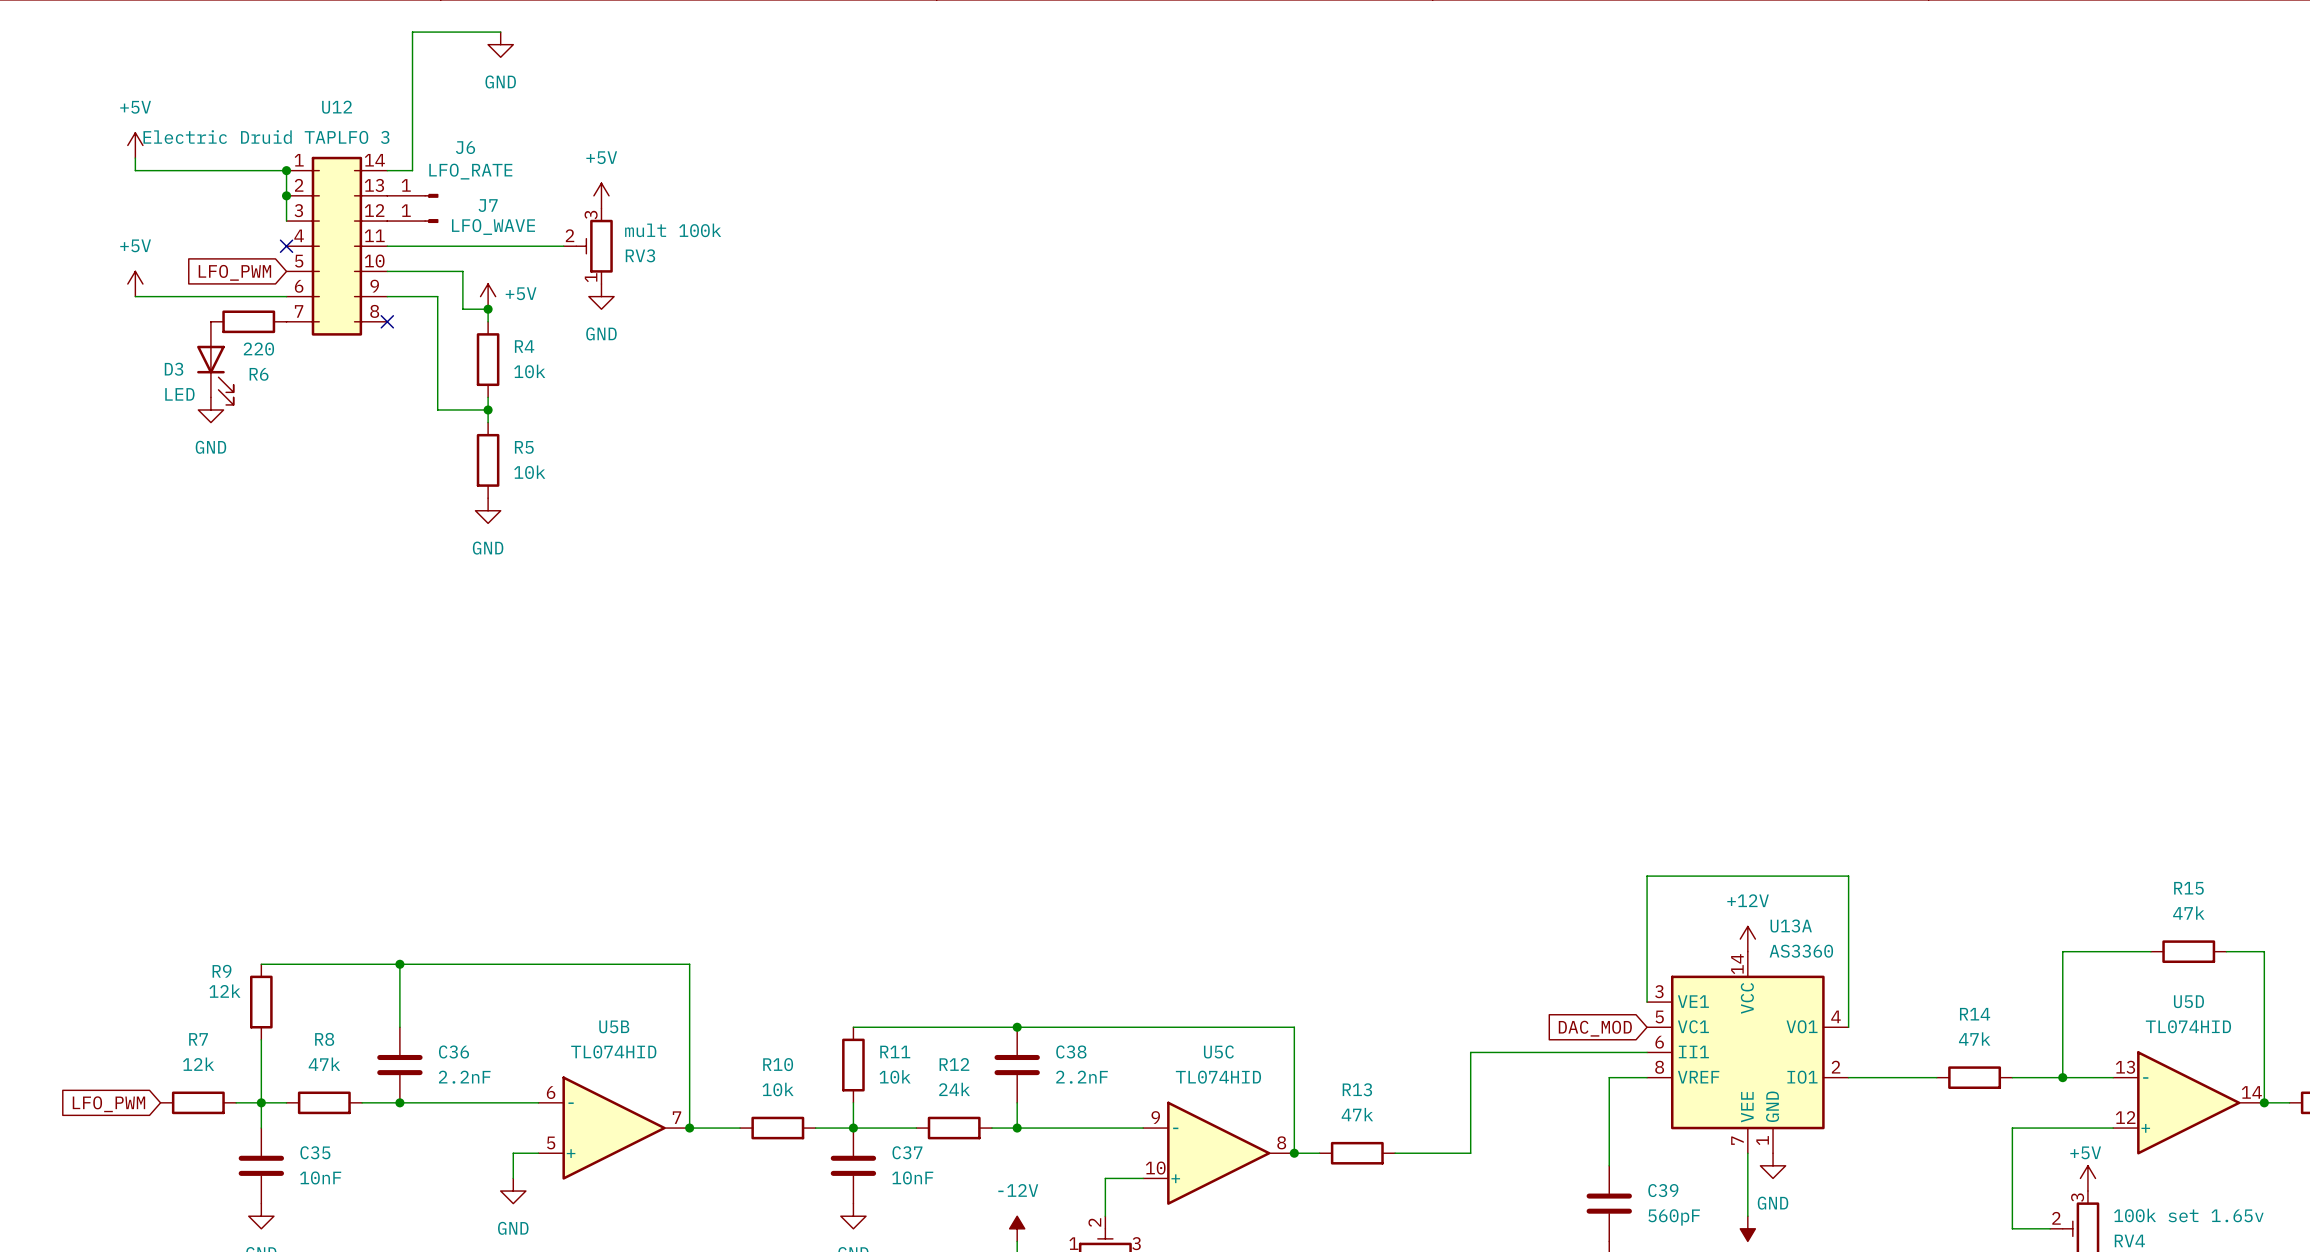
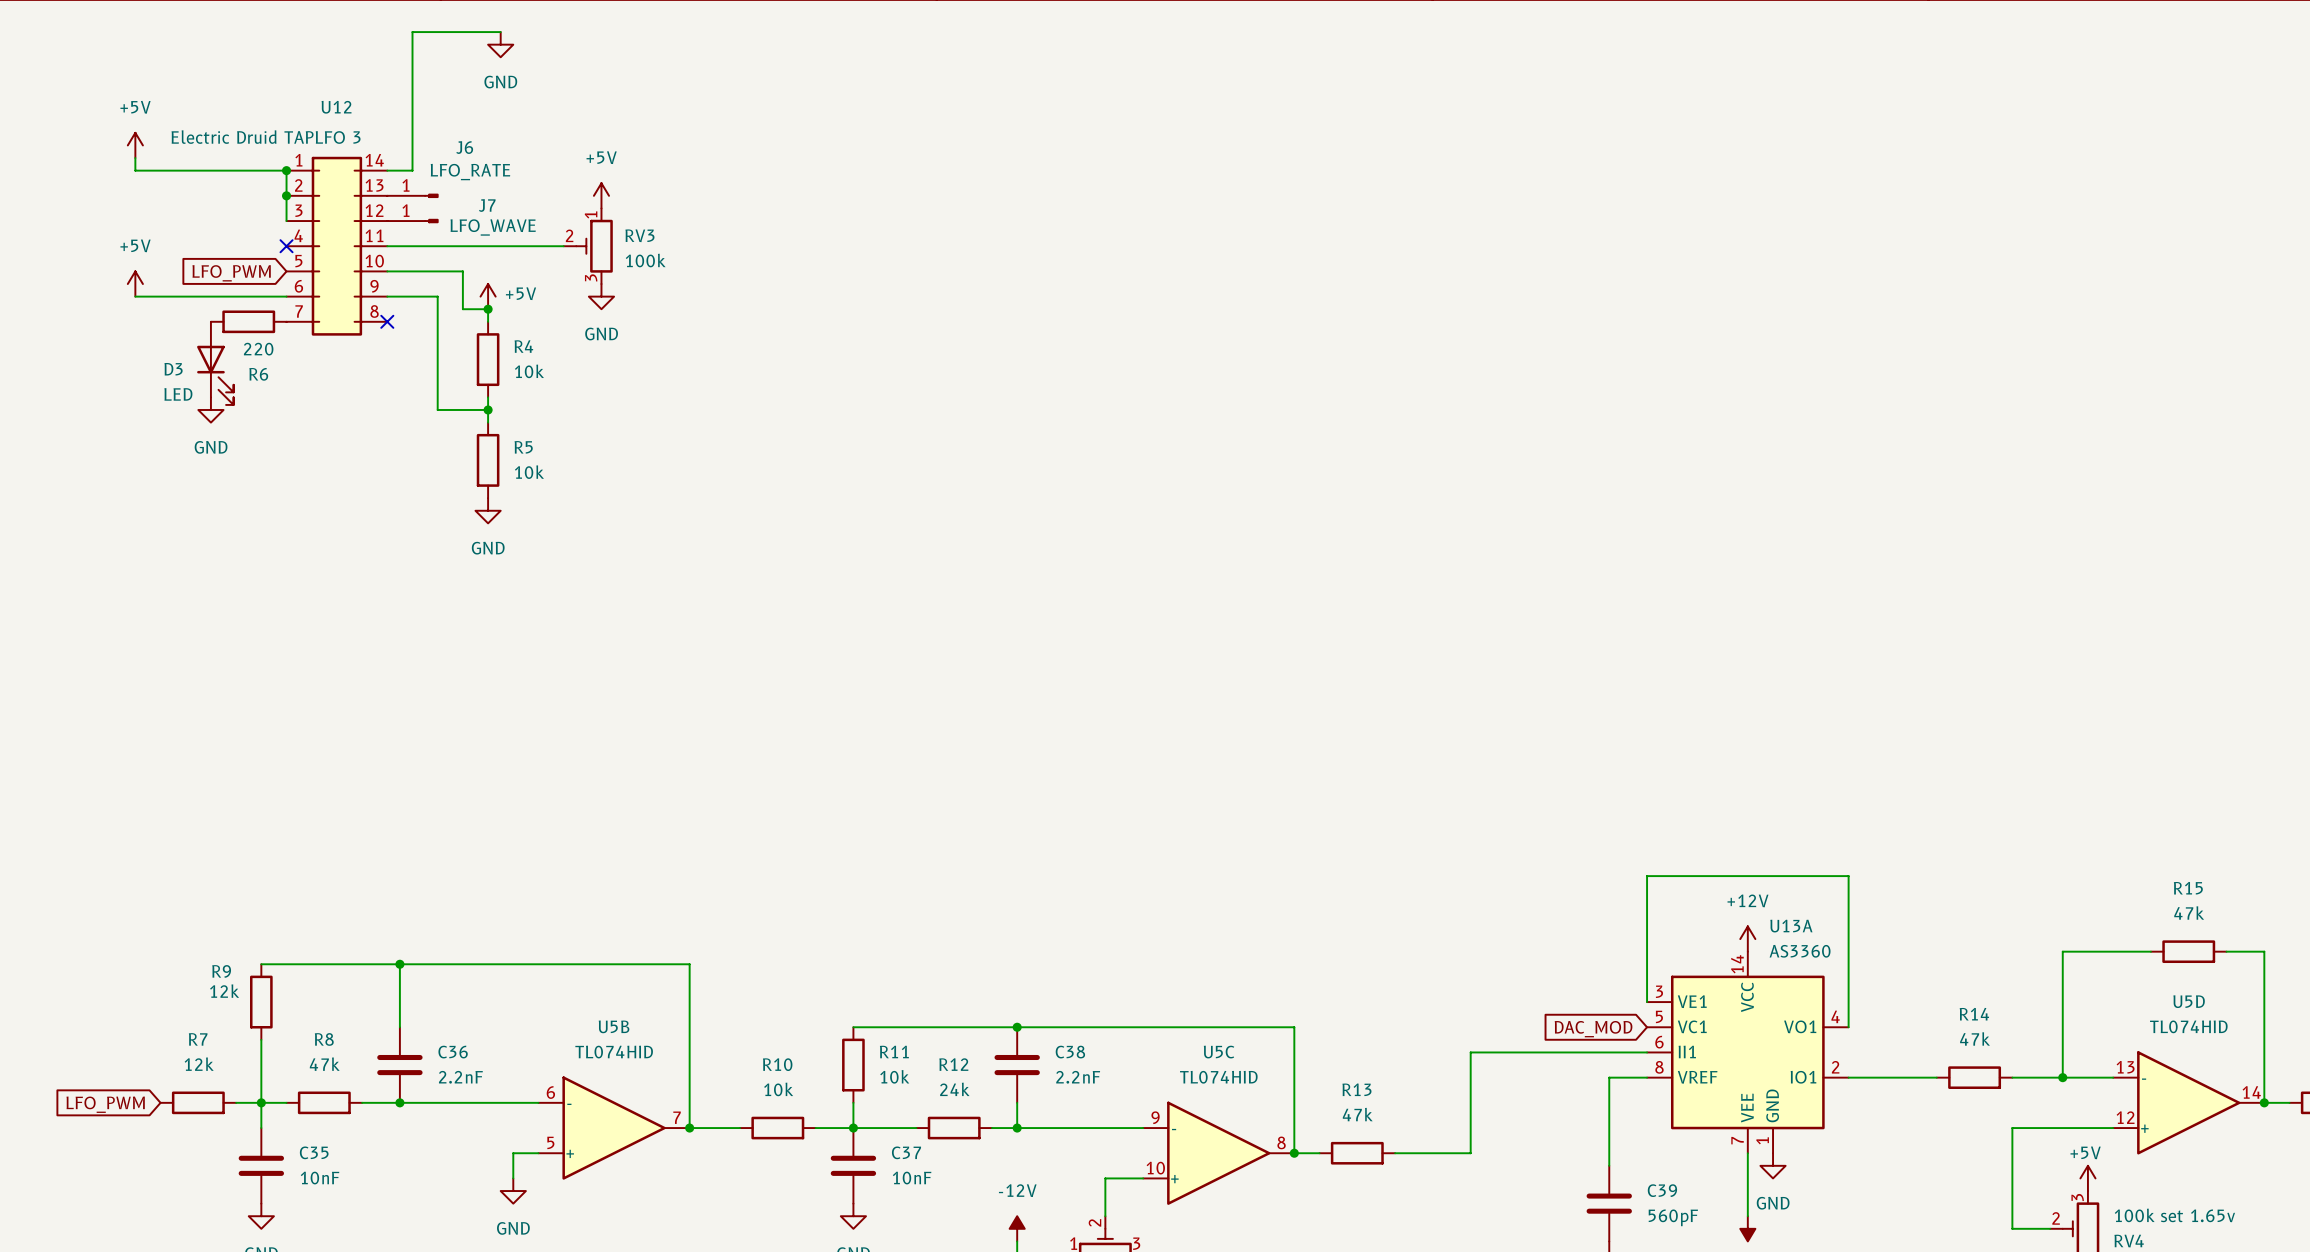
RV3 value: mult 100k (673, 230) -> 100k (645, 260)
RV3 flip: as is (594, 246) -> up-down (594, 246)

